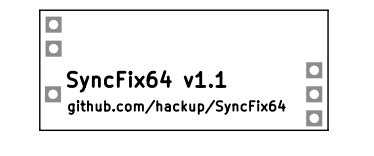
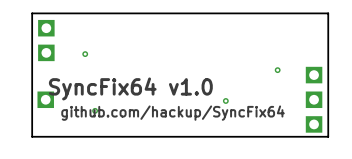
part: none -> (85, 54)
part: none -> (277, 70)
text: SyncFix64 v1.1 (146, 81) -> SyncFix64 v1.0 (130, 88)
part: none -> (225, 100)
part: none -> (95, 110)

